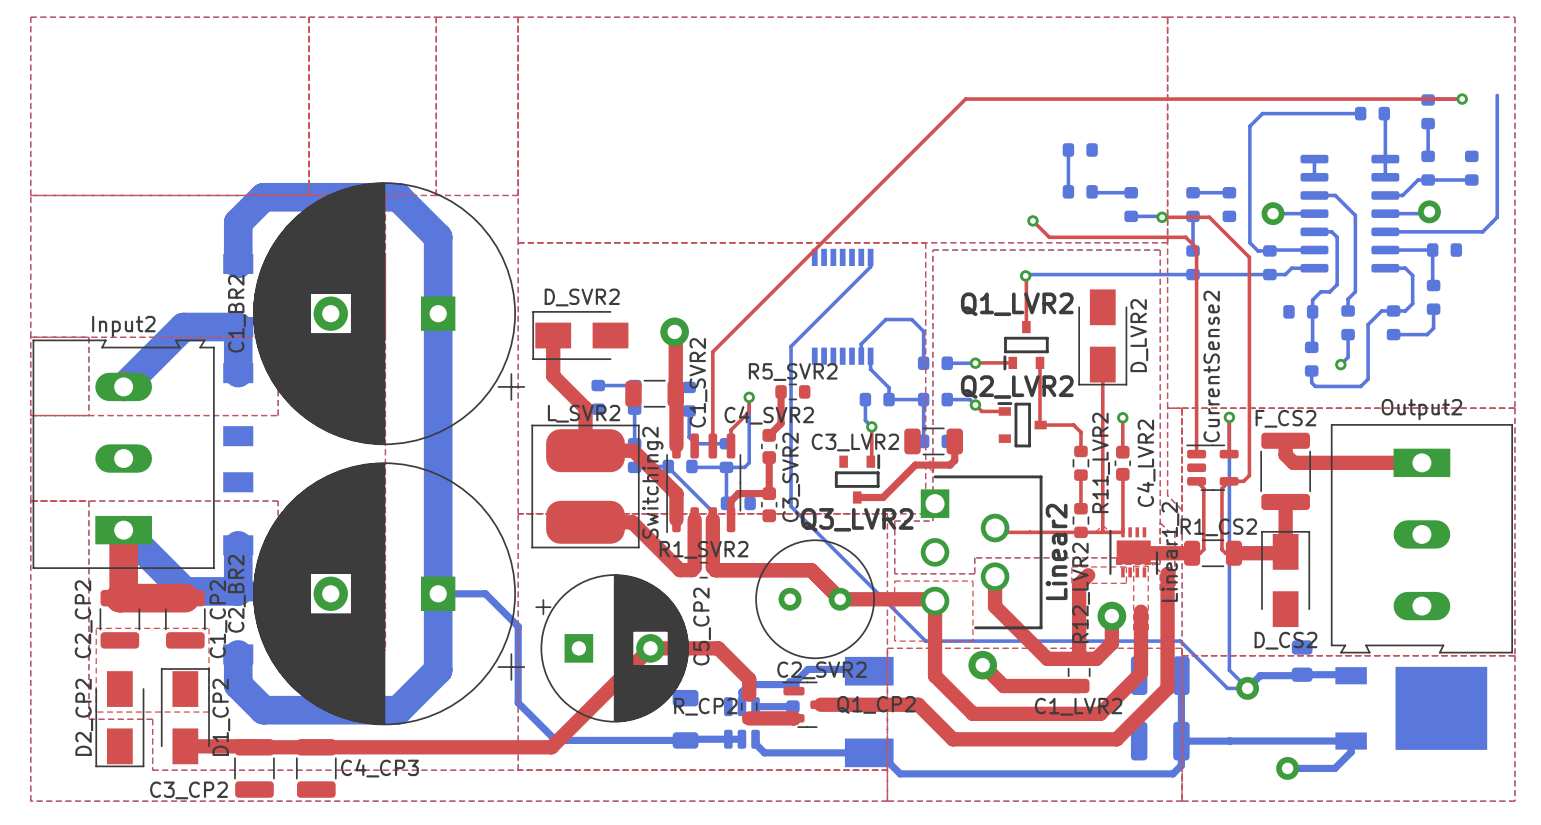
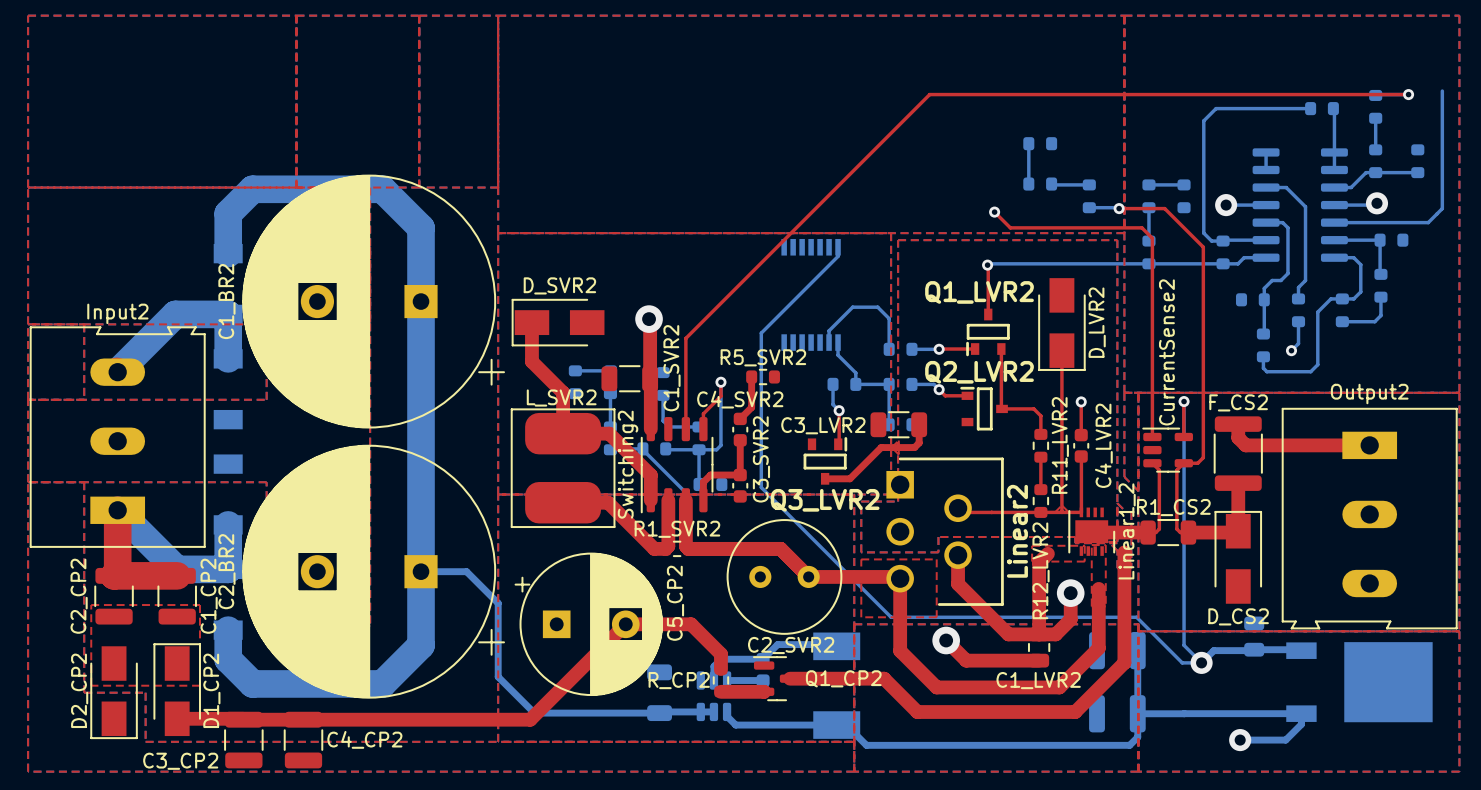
C4_CP3 name: C4_CP3 (379, 768) -> C4_CP2 (364, 739)

